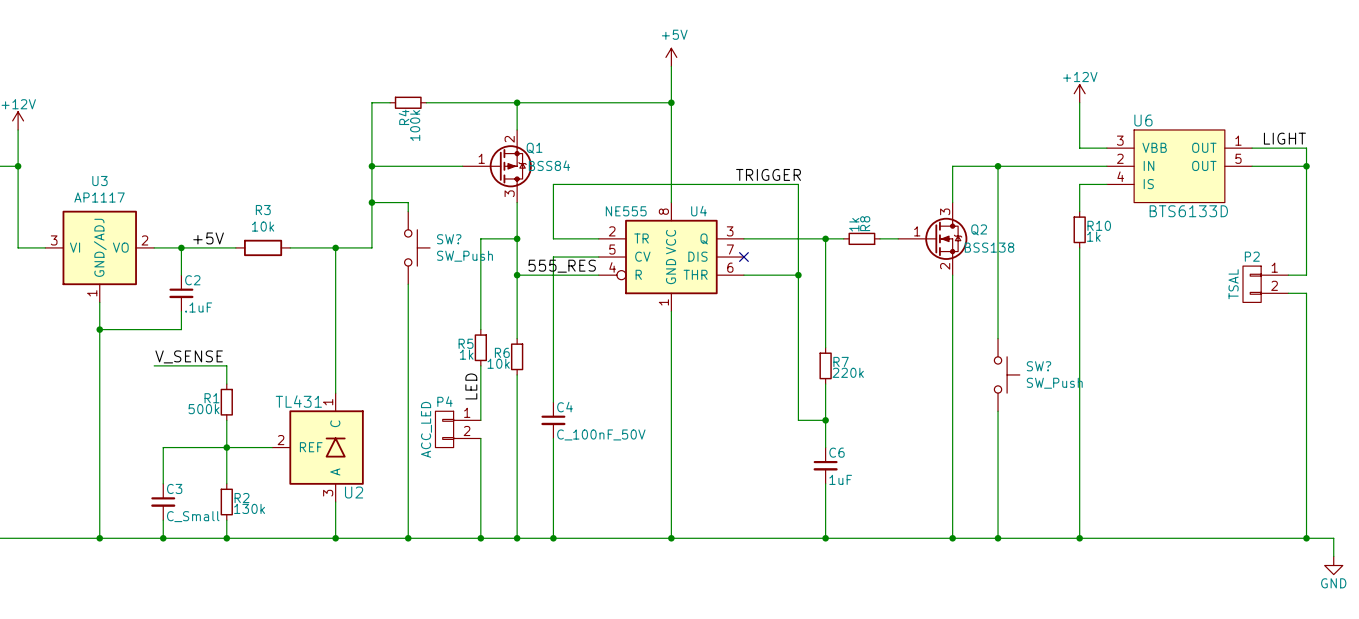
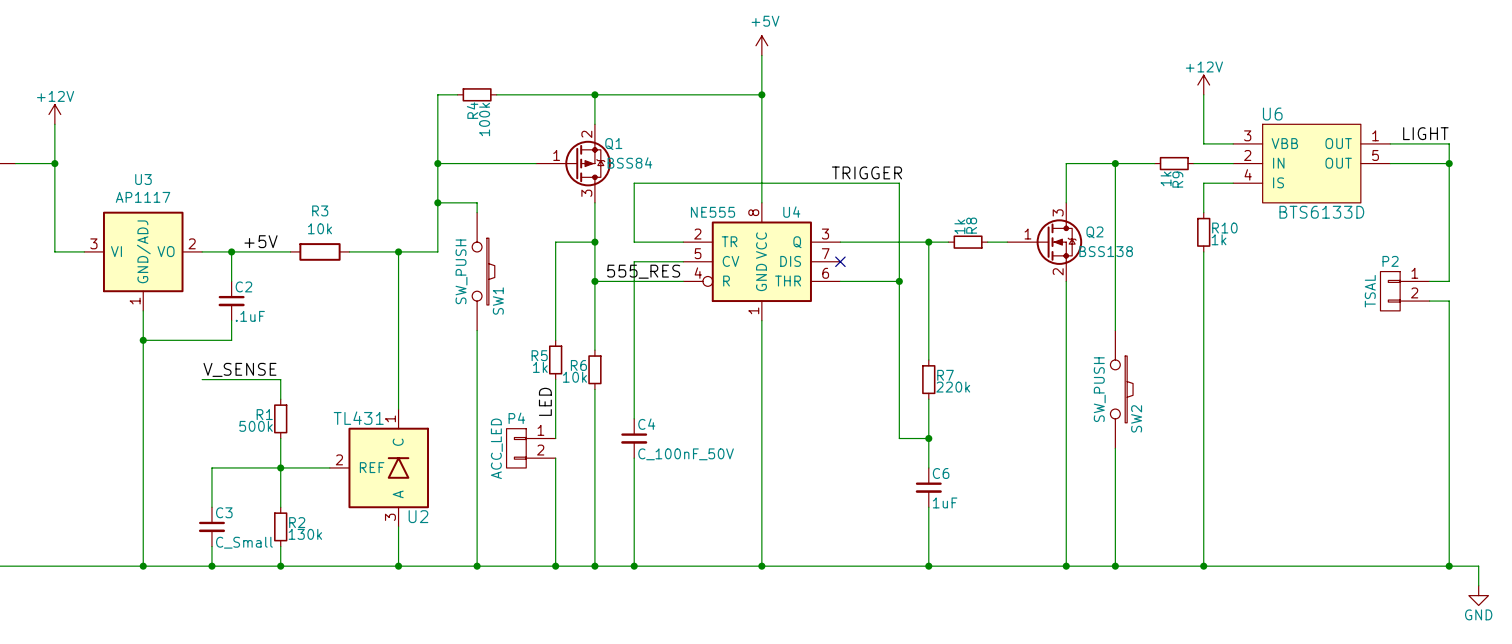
wire: (1034, 166) (1070, 166) -> none
R9: none -> 1k (1174, 163)
SW?: SW_Push (417, 247) -> none
SW1: none -> SW_PUSH (483, 271)
SW2: none -> SW_PUSH (1121, 389)
SW?: SW_Push (1007, 374) -> none

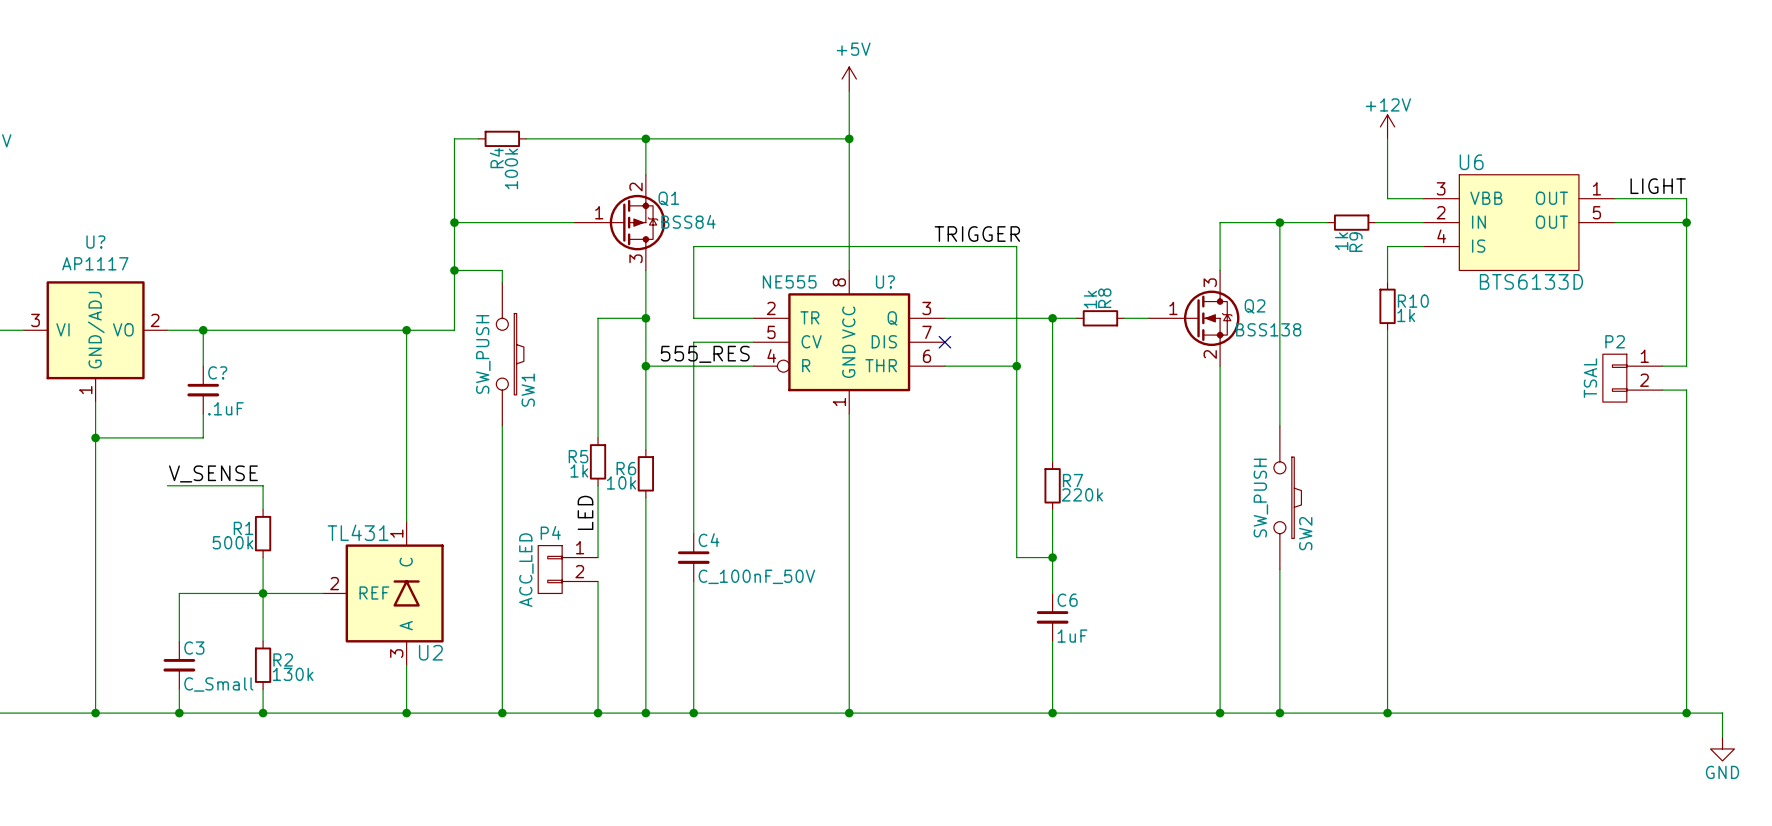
U3 name: U3 (143, 179) -> U? (95, 242)
U4 name: U4 (791, 212) -> U? (885, 281)
label: +5V (261, 241) -> none
wire: none -> (275, 330) (346, 330)
R3: 10k (319, 251) -> none
C2 name: C2 (243, 286) -> C? (217, 372)

